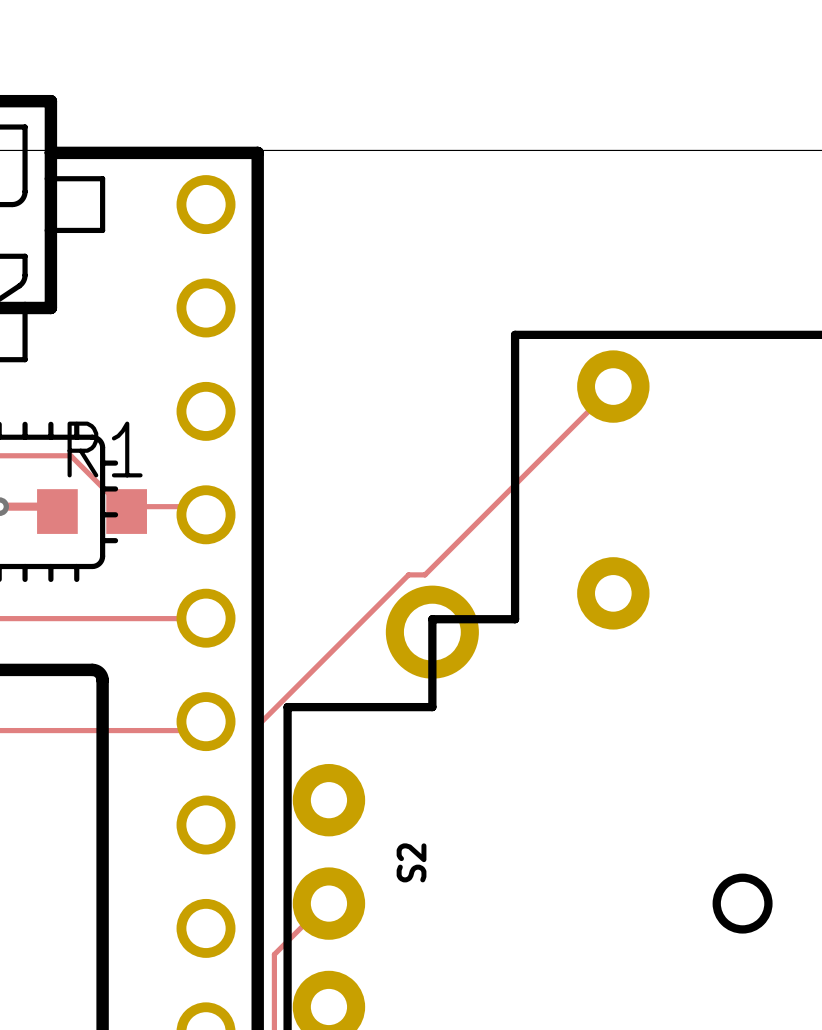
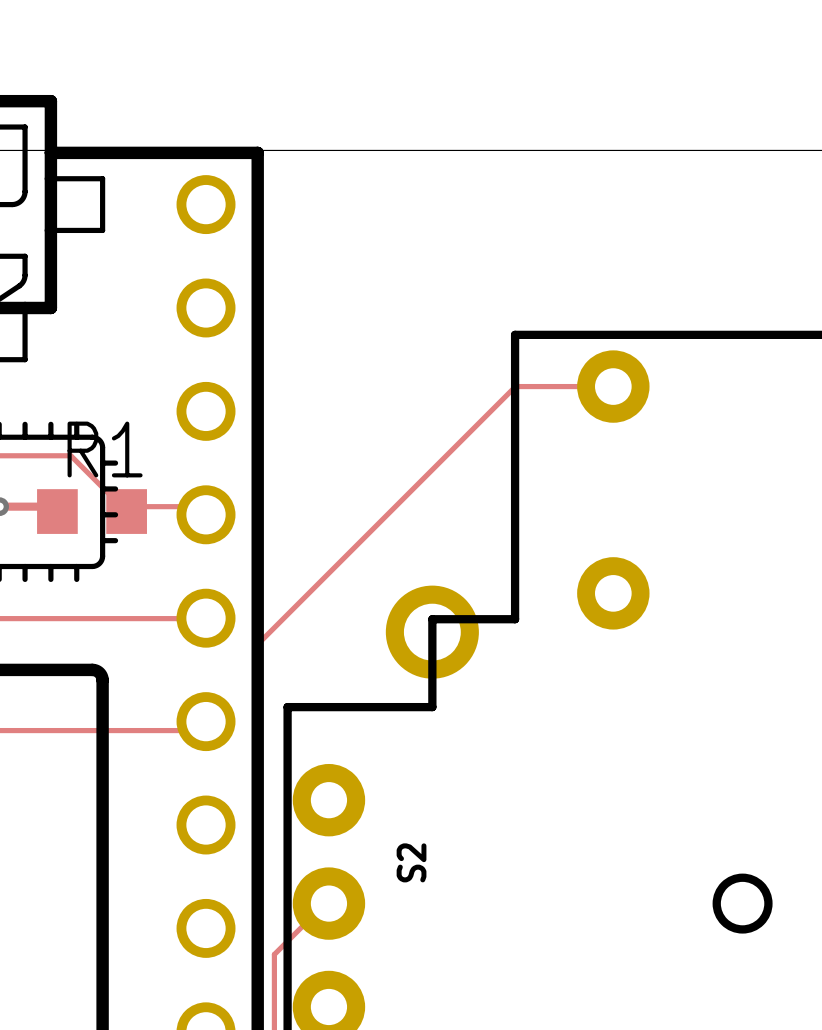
top track: (613, 386) (424, 574) (408, 574) (256, 727) -> (613, 386) (515, 386) (256, 645) (256, 727)

